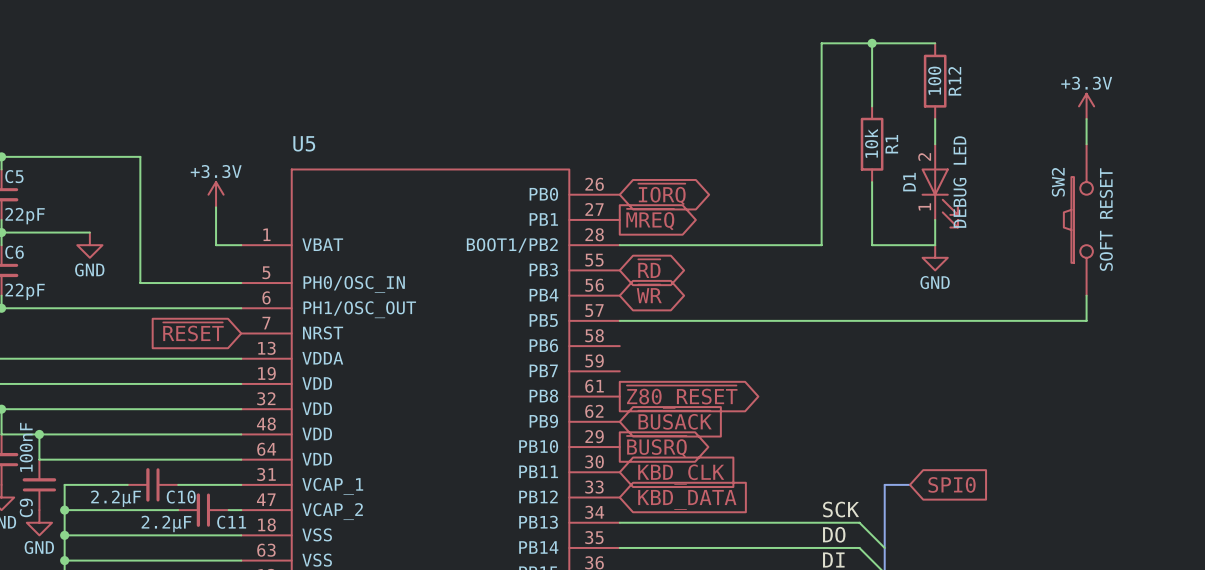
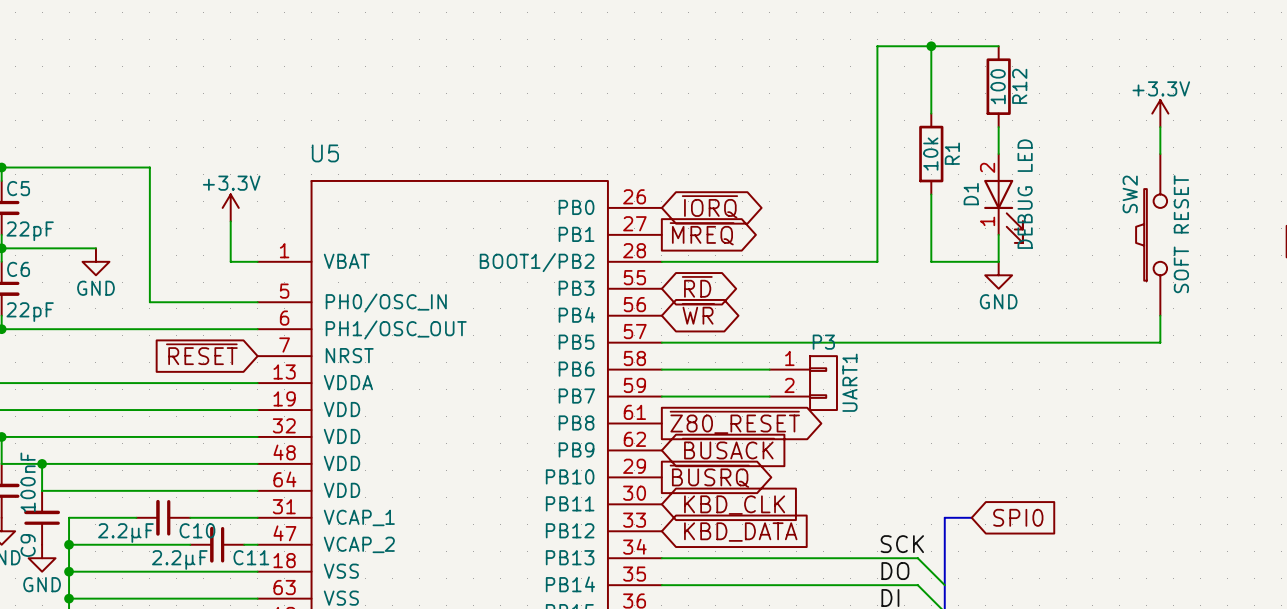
wire: none -> (661, 369) (769, 369)
P3: none -> UART1 (803, 383)
wire: none -> (661, 396) (769, 396)

